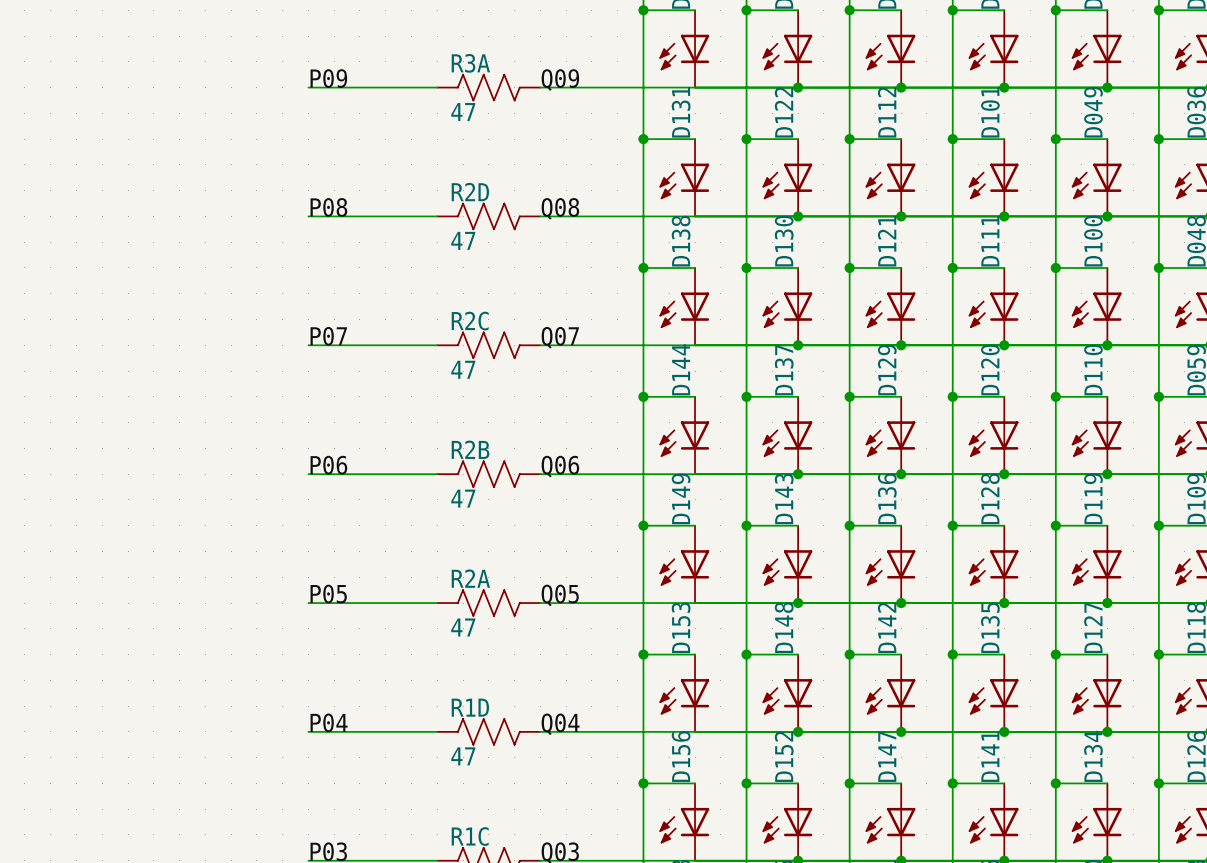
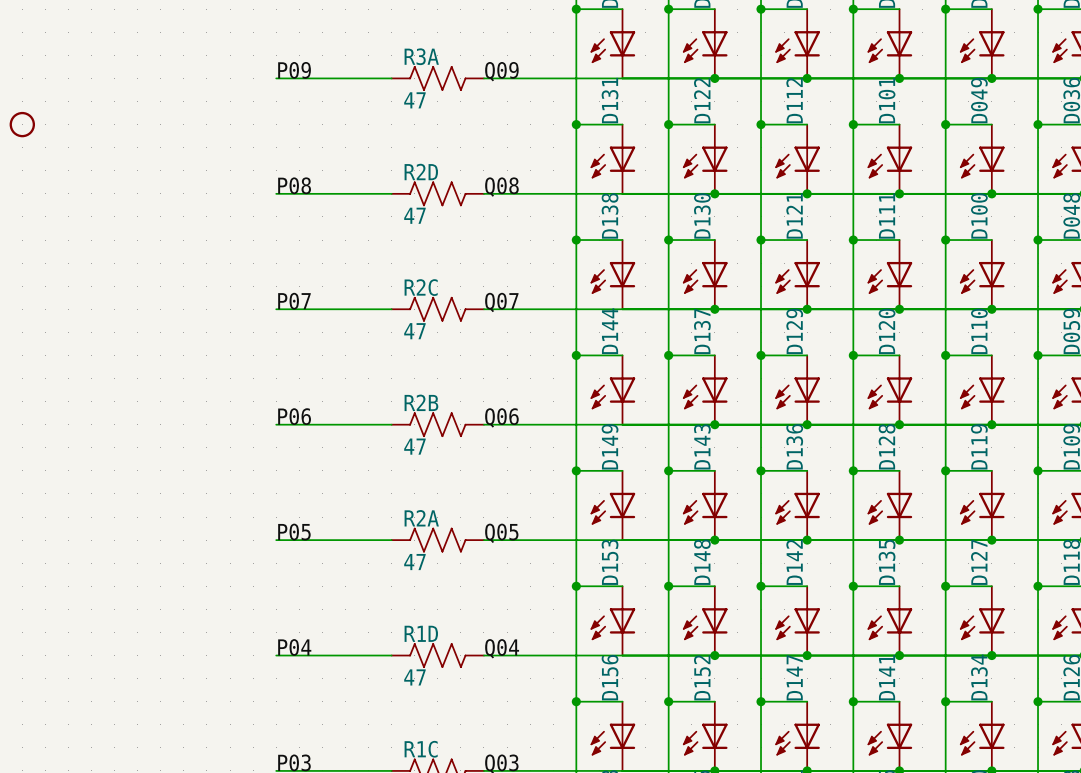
part: none -> (22, 124)

